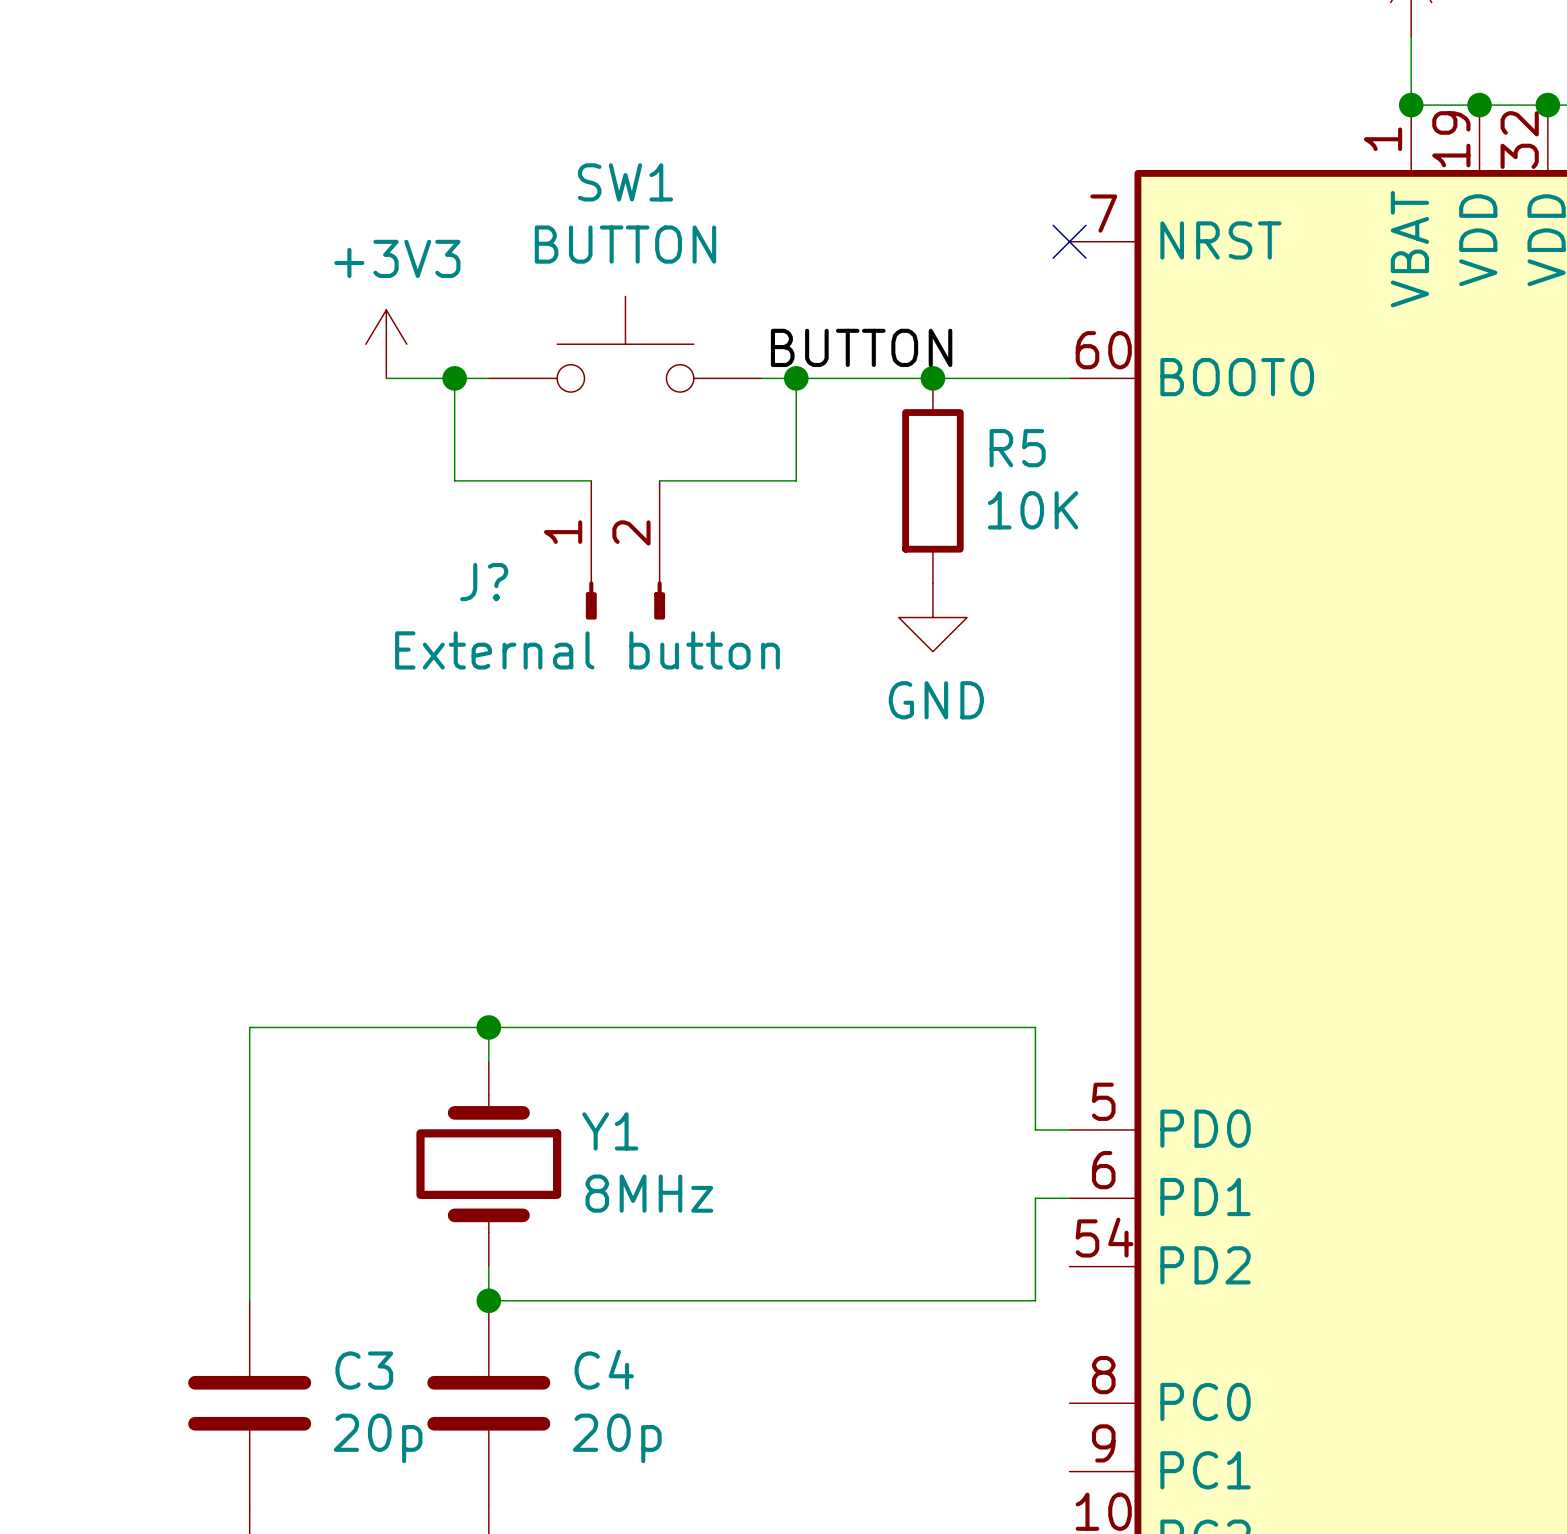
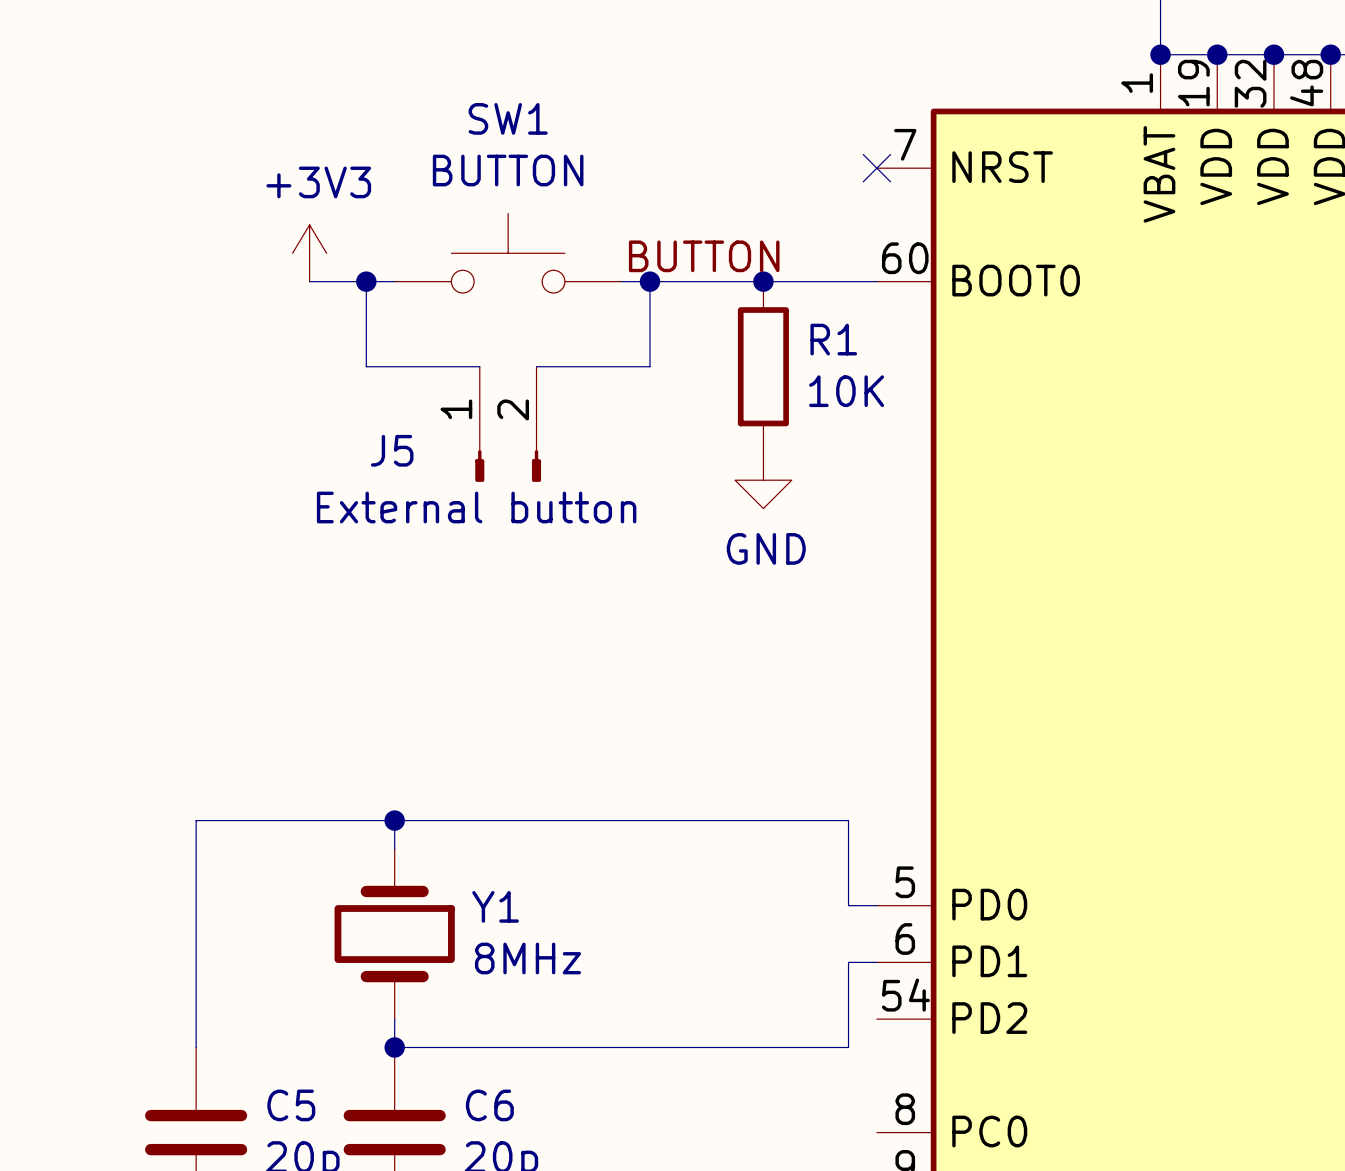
R5 name: R5 (1017, 448) -> R1 (833, 339)
J? name: J? (484, 582) -> J5 (392, 450)
C4 name: C4 (604, 1369) -> C6 (489, 1105)
C3 name: C3 (364, 1370) -> C5 (291, 1105)

